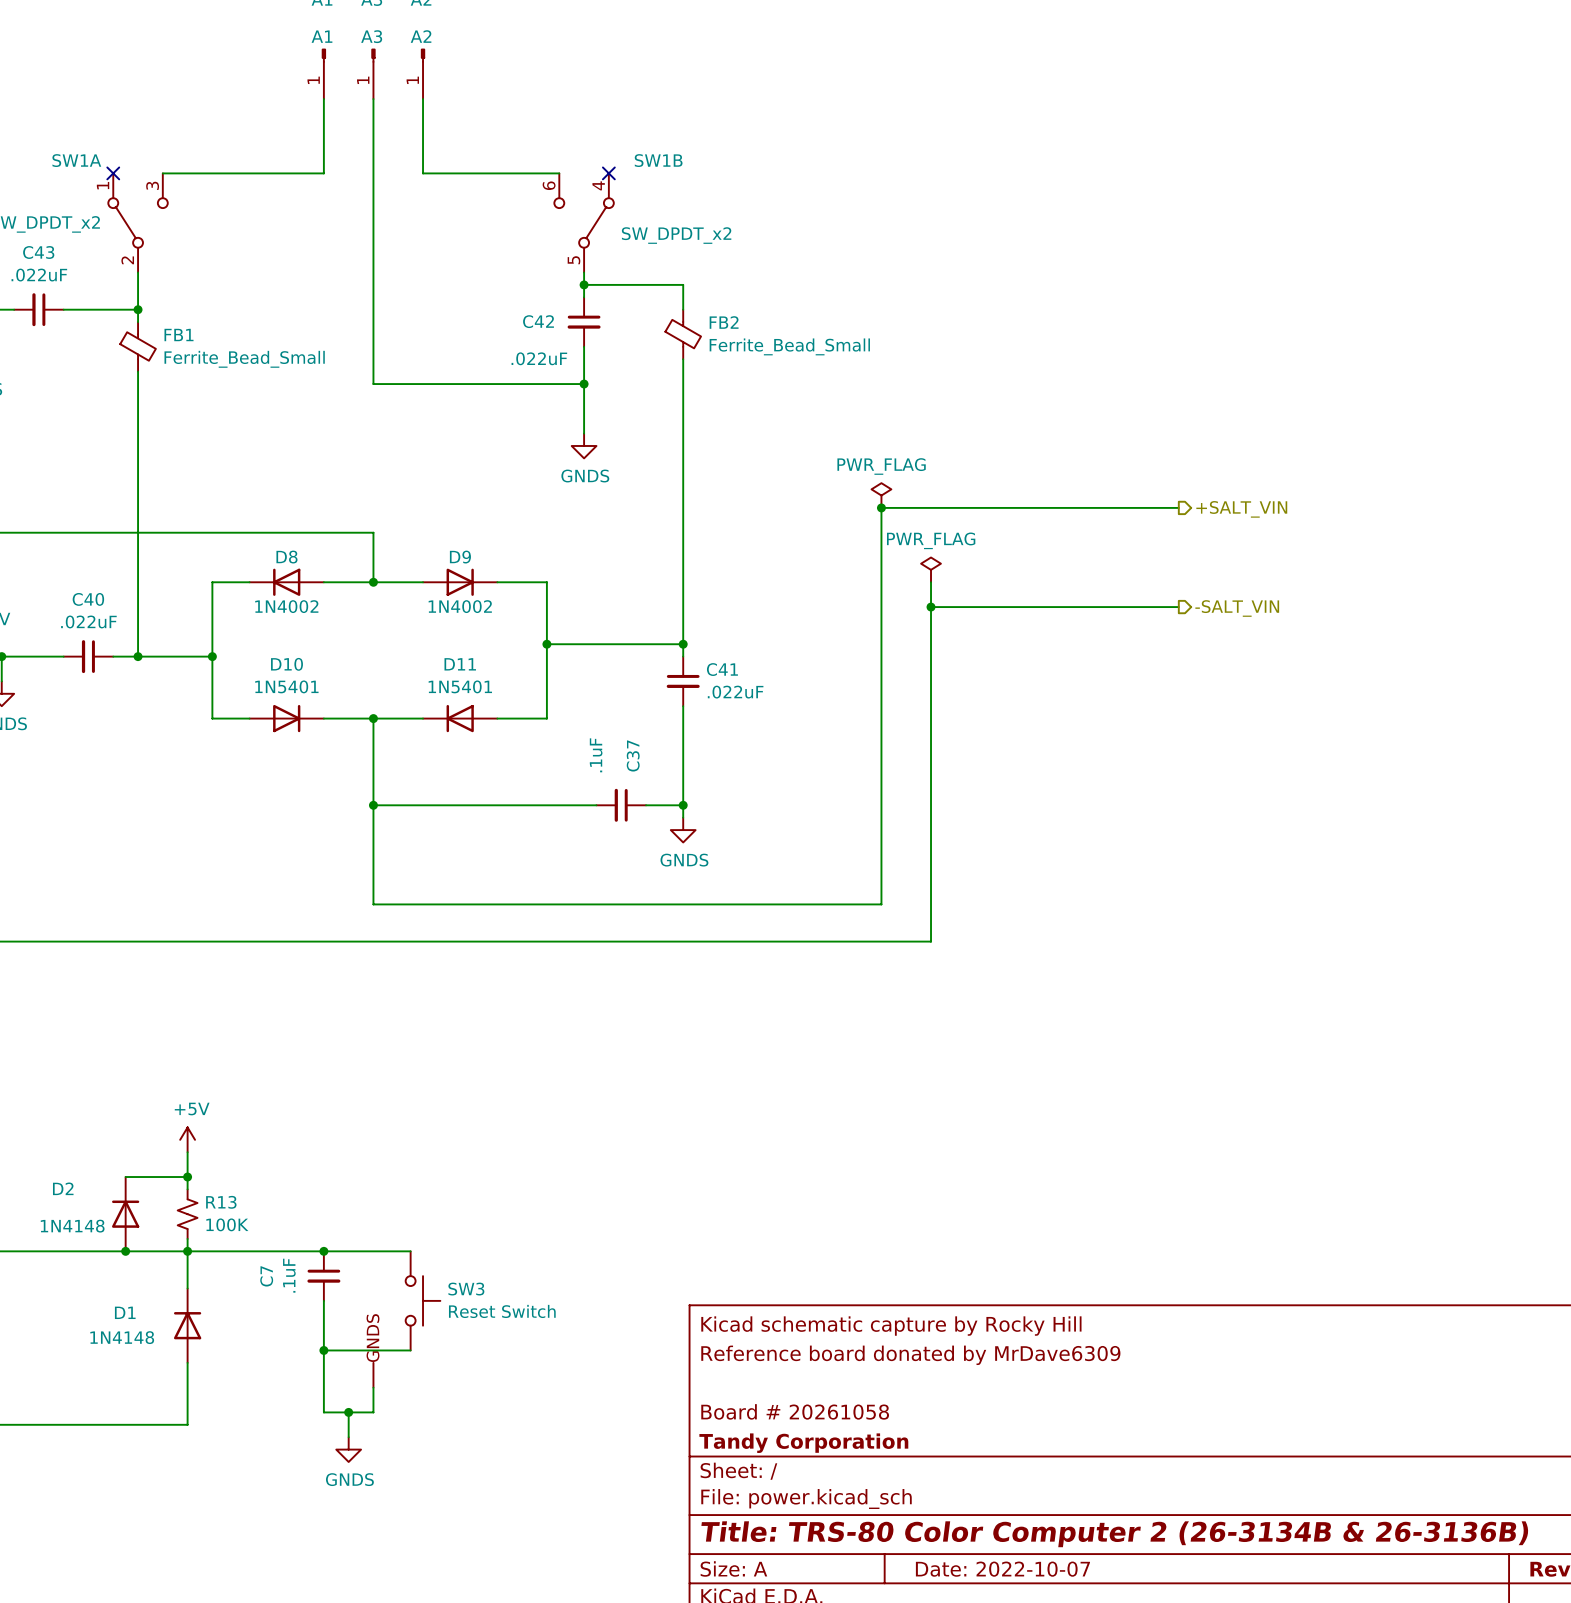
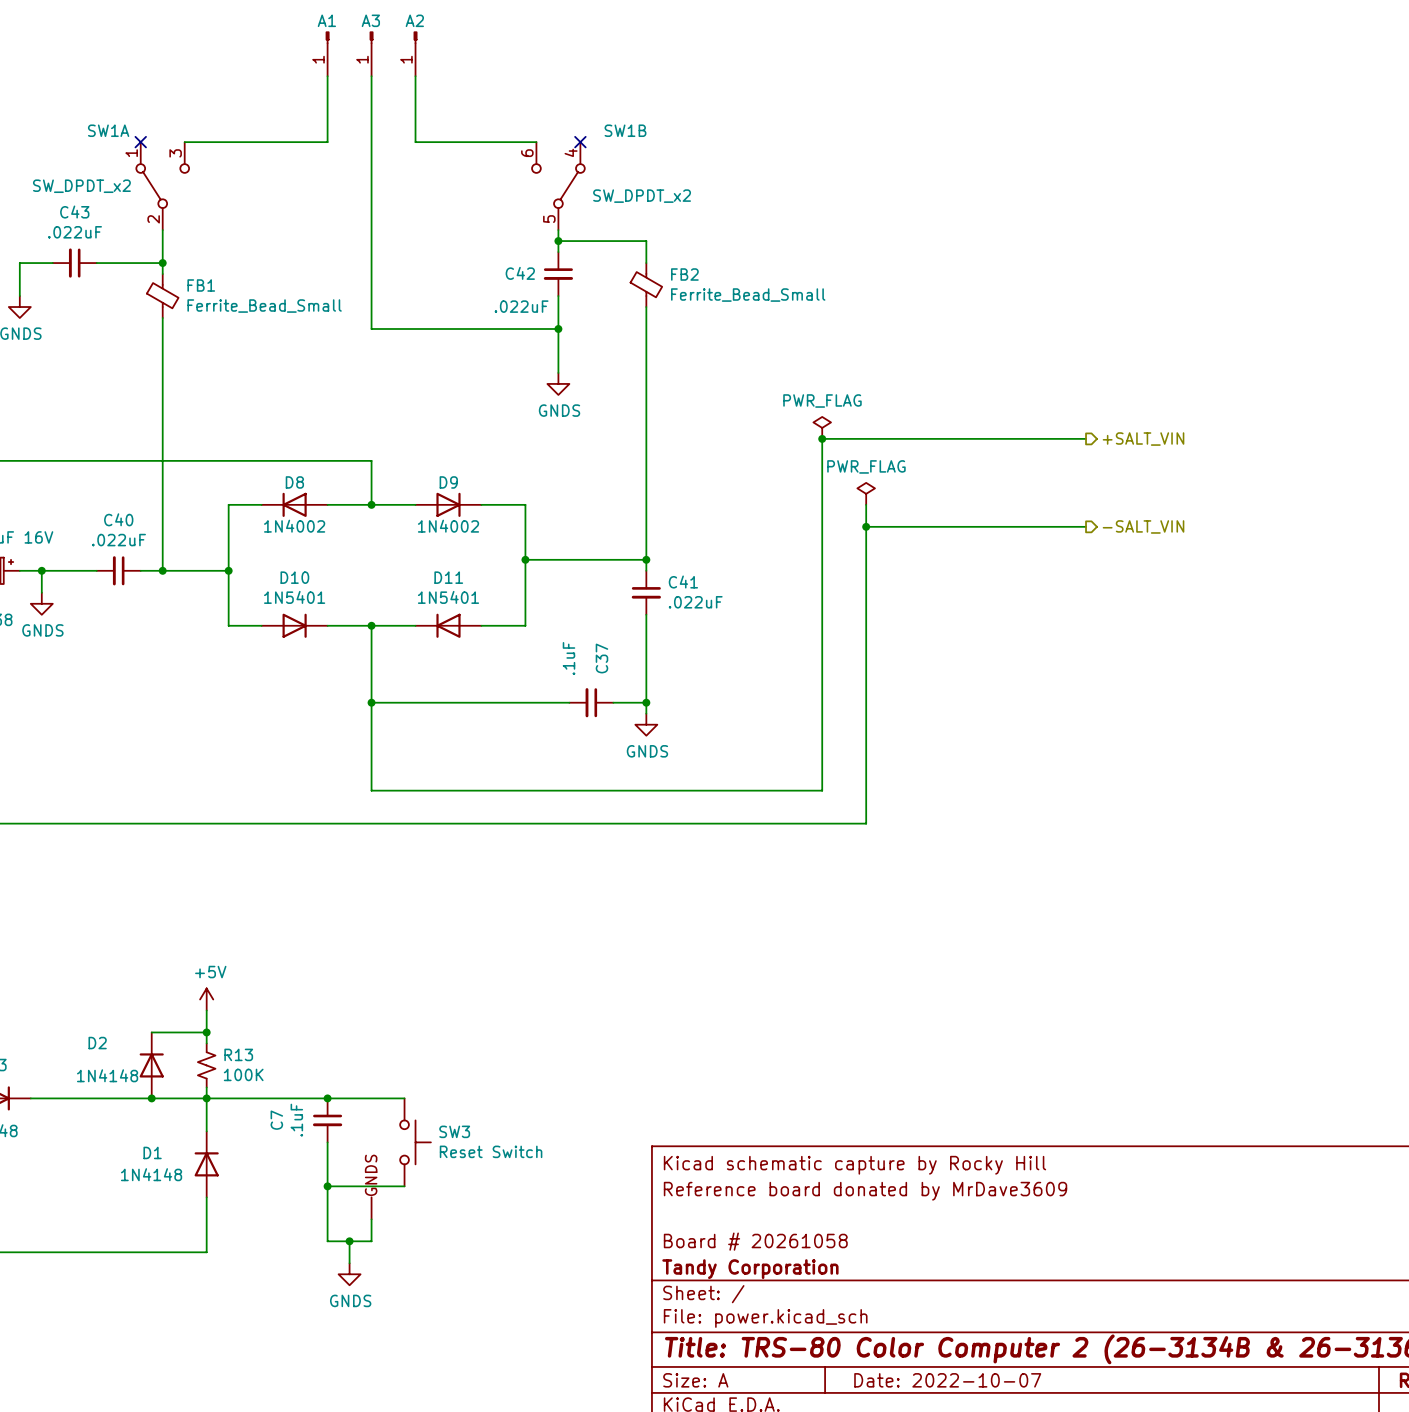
title block: Reference board donated by MrDave6309 (910, 1355) -> Reference board donated by MrDave3609 (865, 1191)

